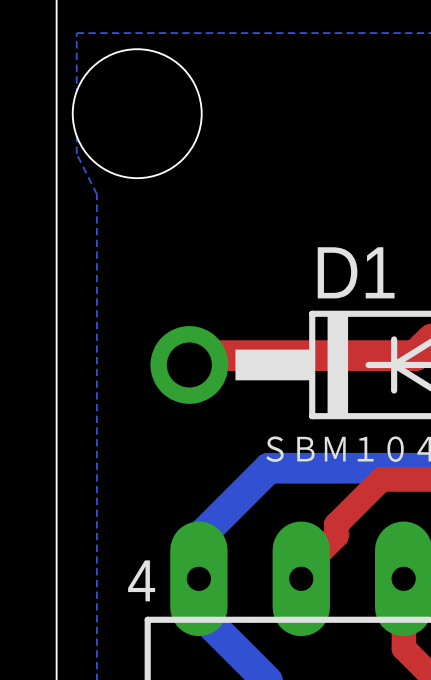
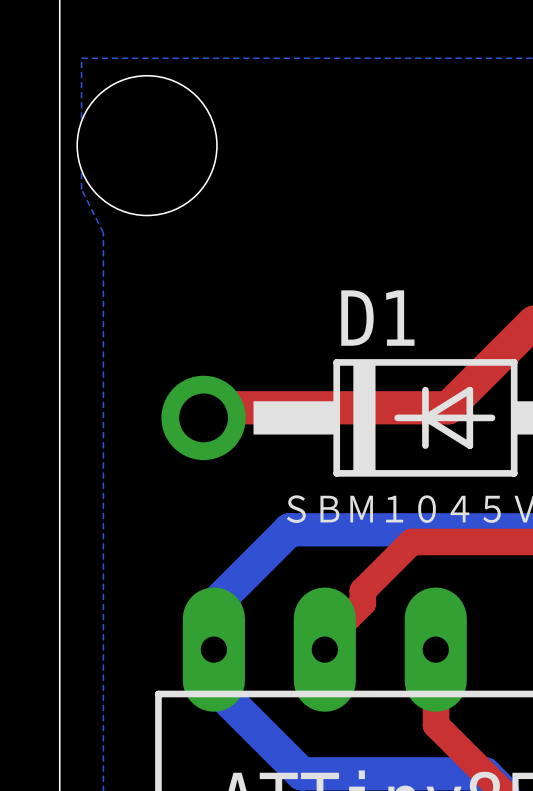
text: 4 (141, 580) -> none

